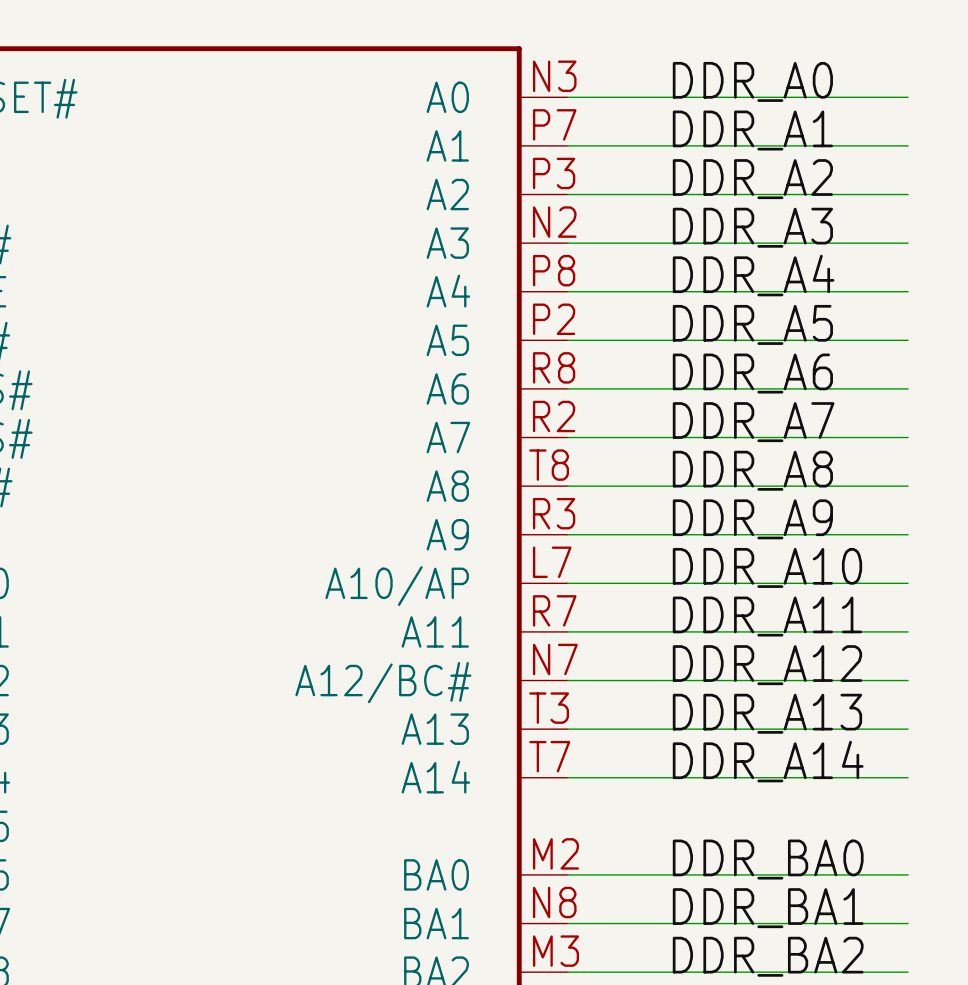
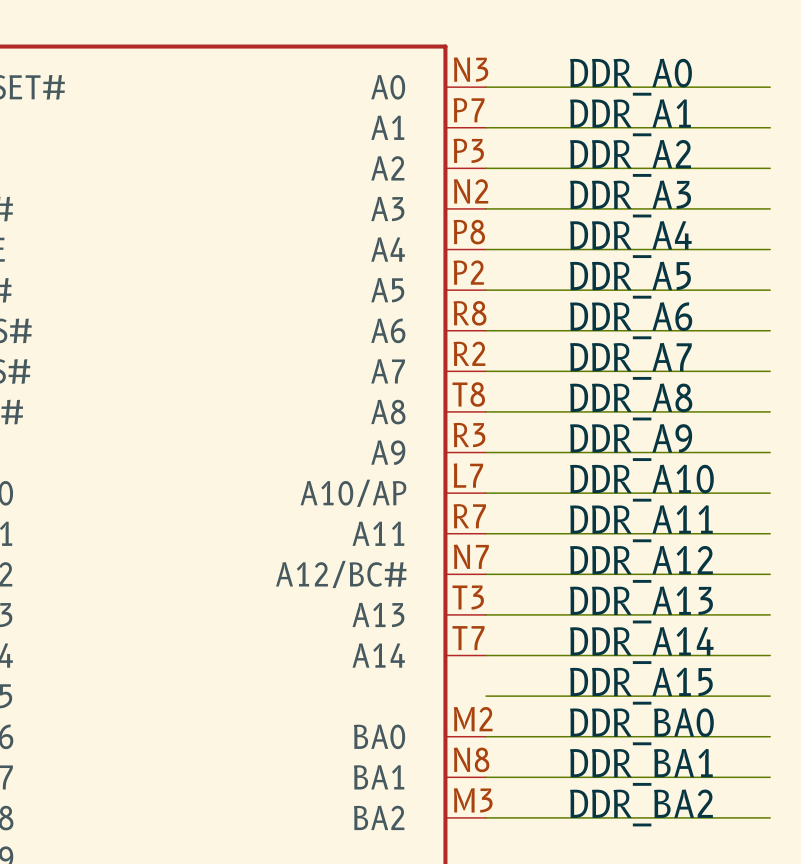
label: none -> DDR_A15 (641, 686)
wire: none -> (486, 696) (770, 696)

